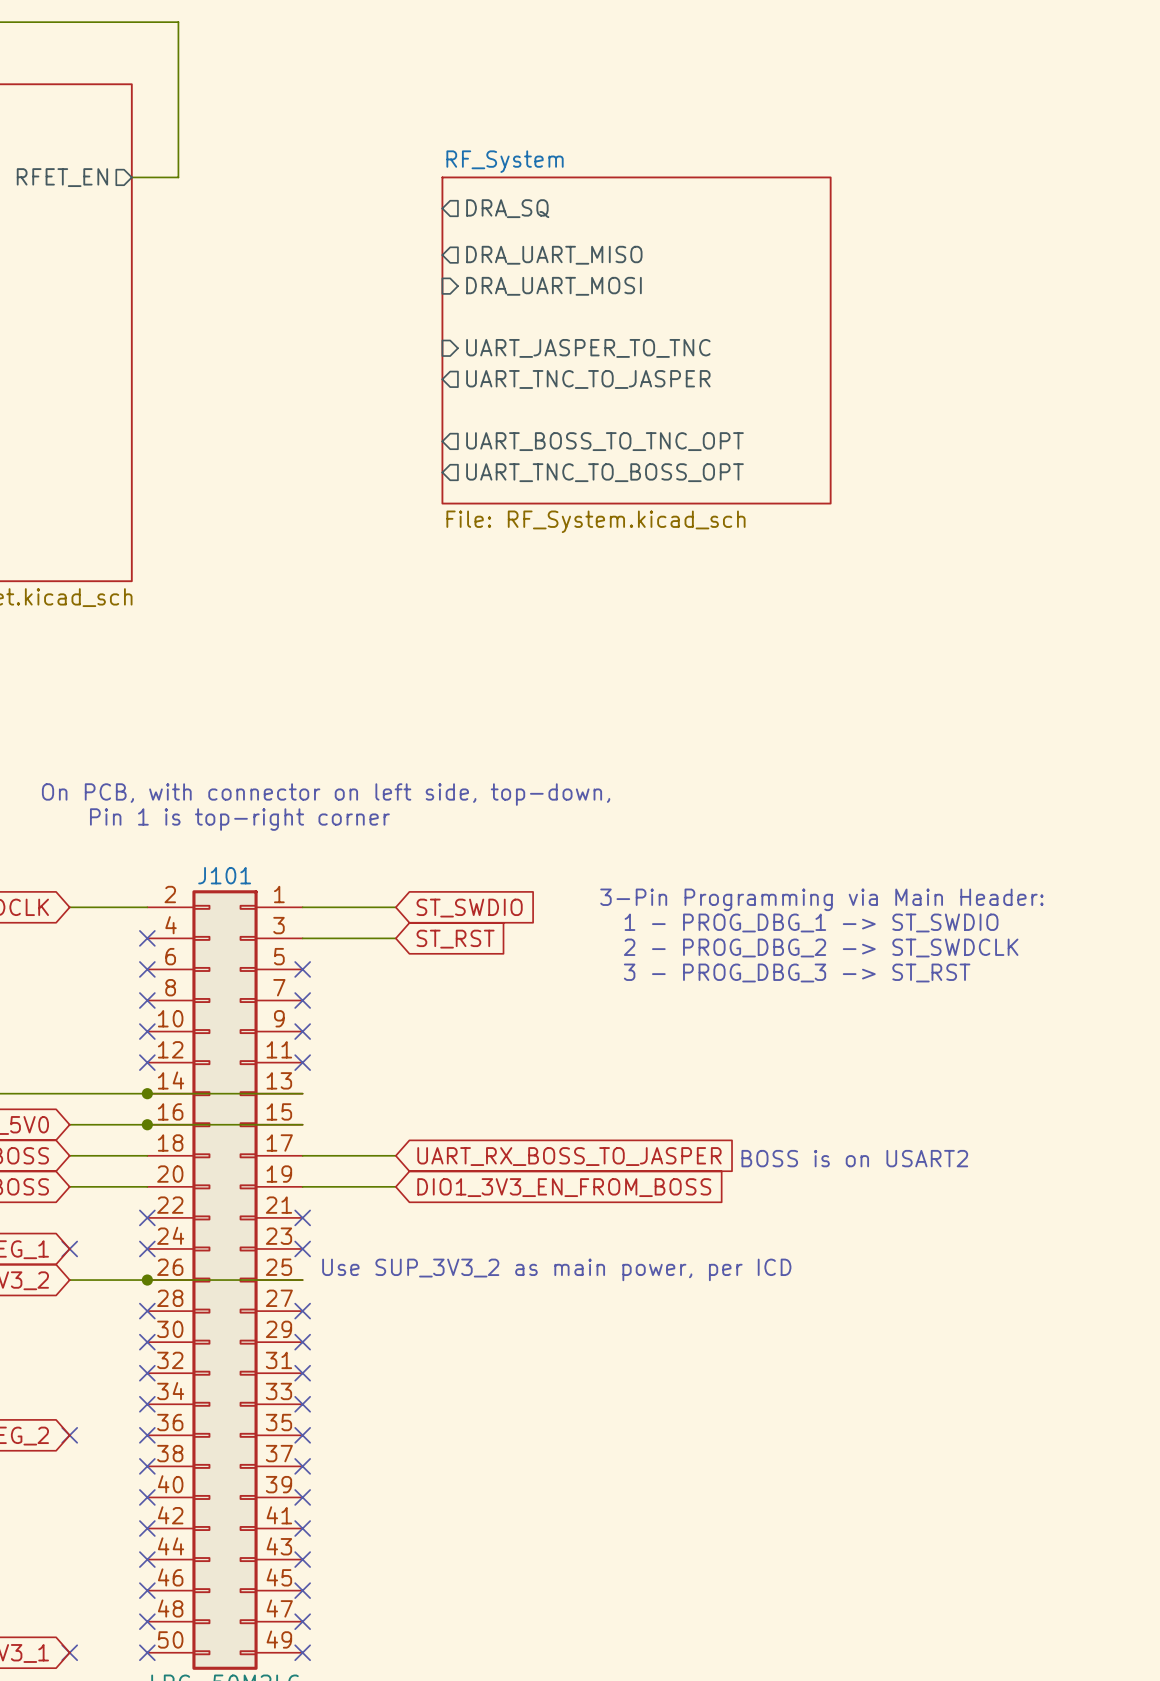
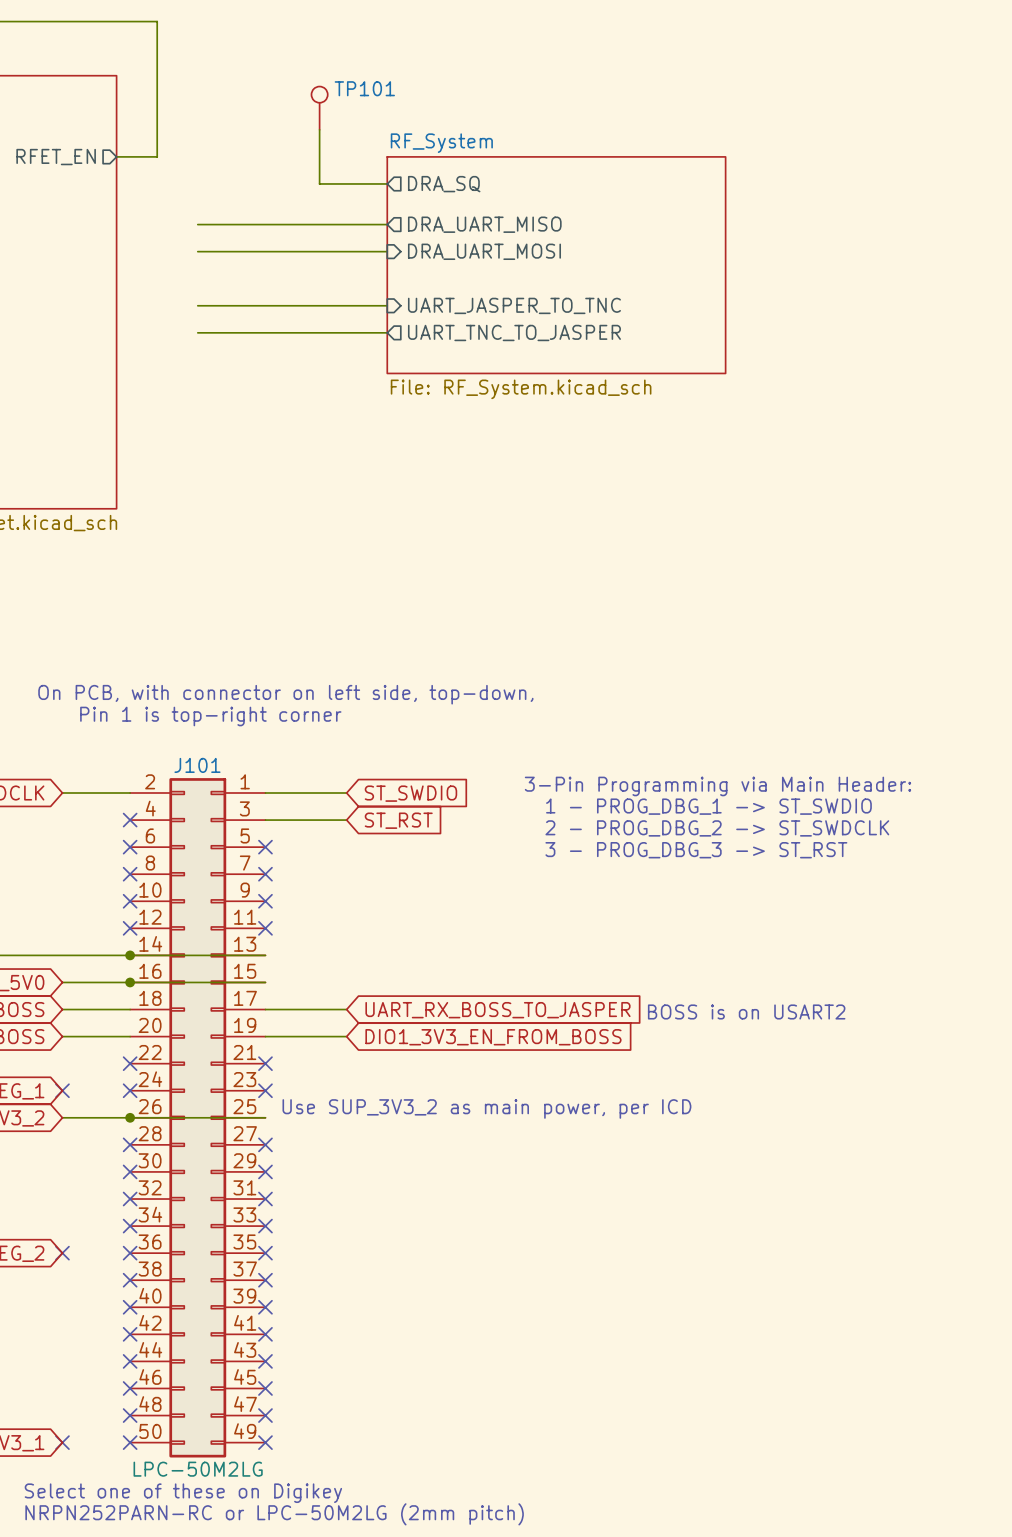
TP101: none -> (319, 108)
wire: none -> (319, 129) (319, 183) (387, 183)
wire: none -> (197, 224) (387, 224)
wire: none -> (197, 251) (387, 251)
sheet RF_System: none -> File: RF_System.kicad_sch (556, 265)
sheet RF_System: File: RF_System.kicad_sch (636, 340) -> none
wire: none -> (197, 305) (387, 305)
wire: none -> (197, 332) (387, 332)
sheet pin: UART_BOSS_TO_TNC_OPT (604, 441) -> none
sheet pin: UART_TNC_TO_BOSS_OPT (604, 472) -> none

